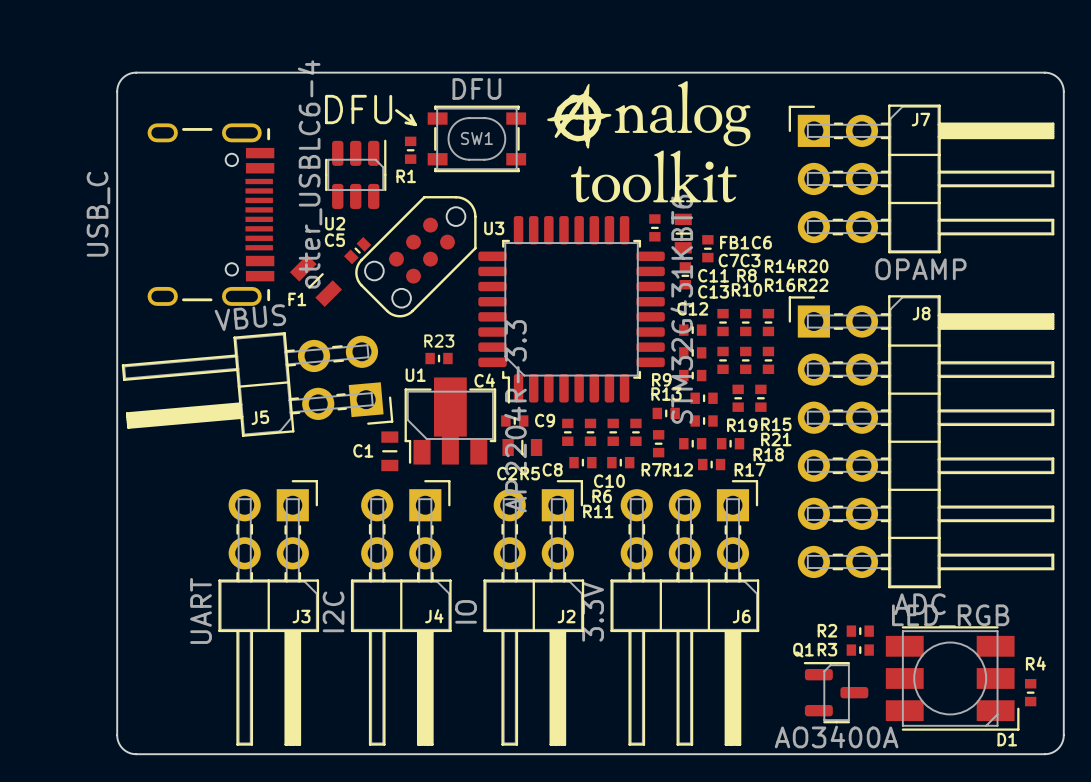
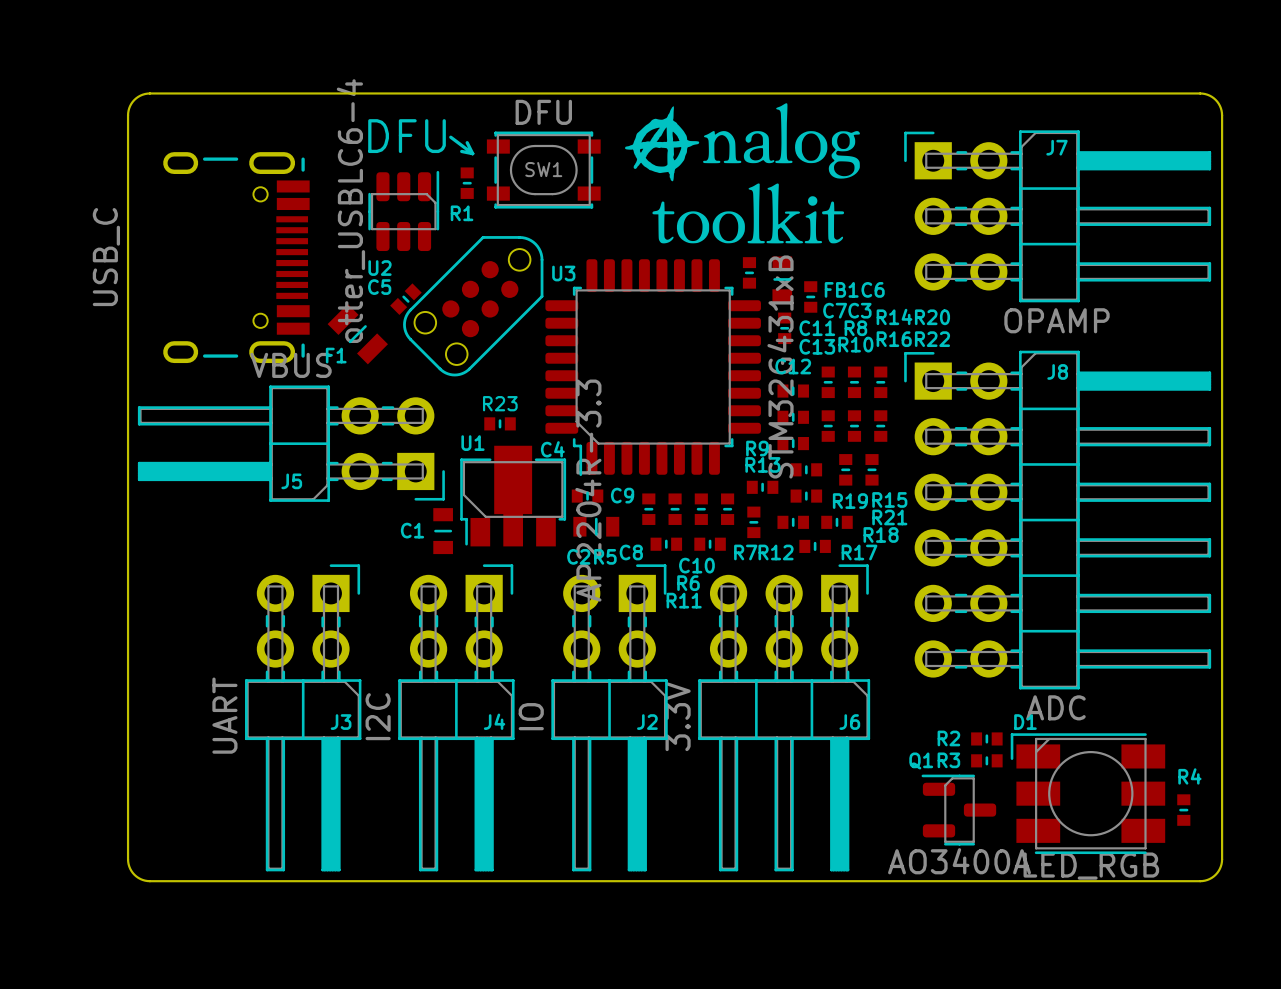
U3 value: STM32G431KBT6 (681, 309) -> STM32G431xB (780, 366)
J5 rotation: 0° (257, 384) -> 5° clockwise (291, 443)
D1 rotation: 0° (952, 678) -> 180° (1087, 793)

